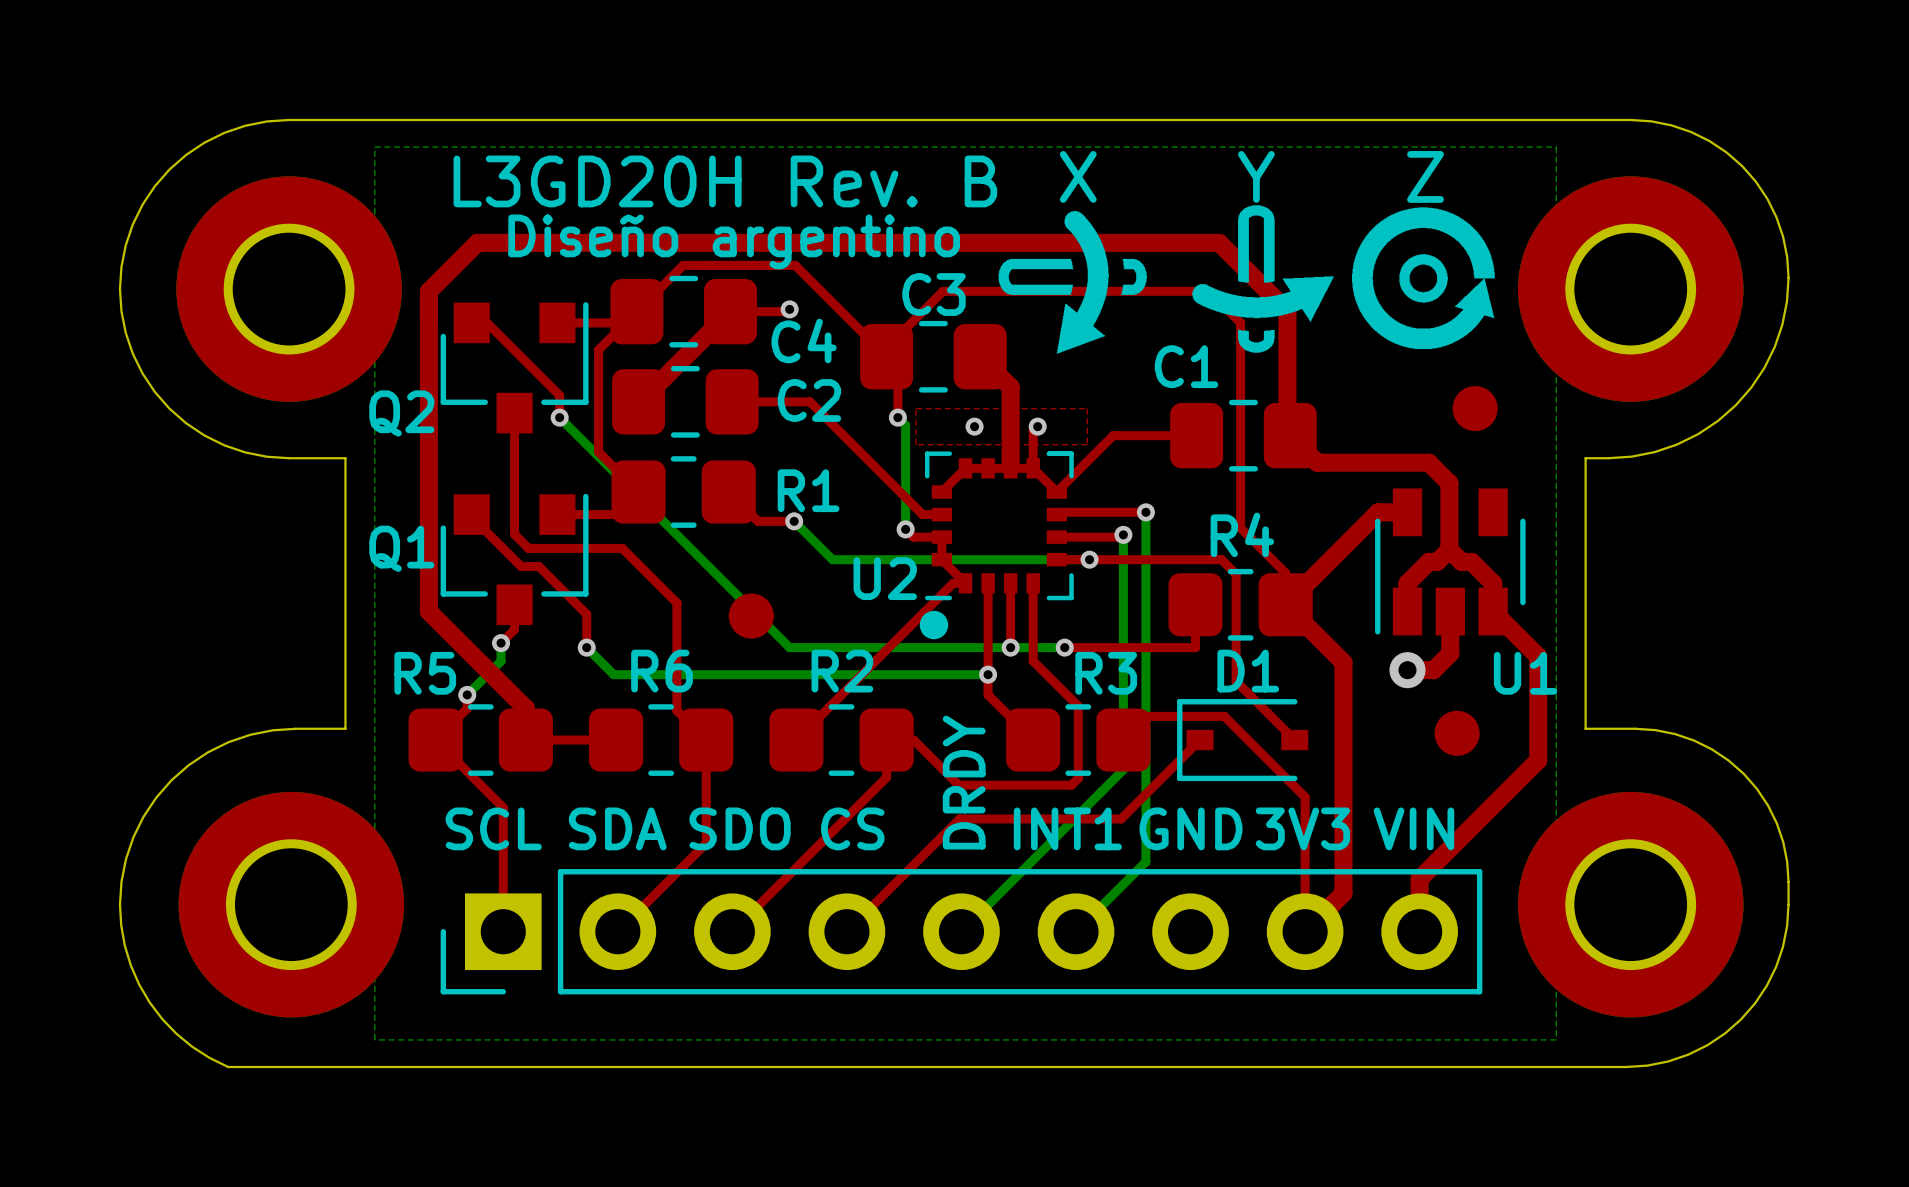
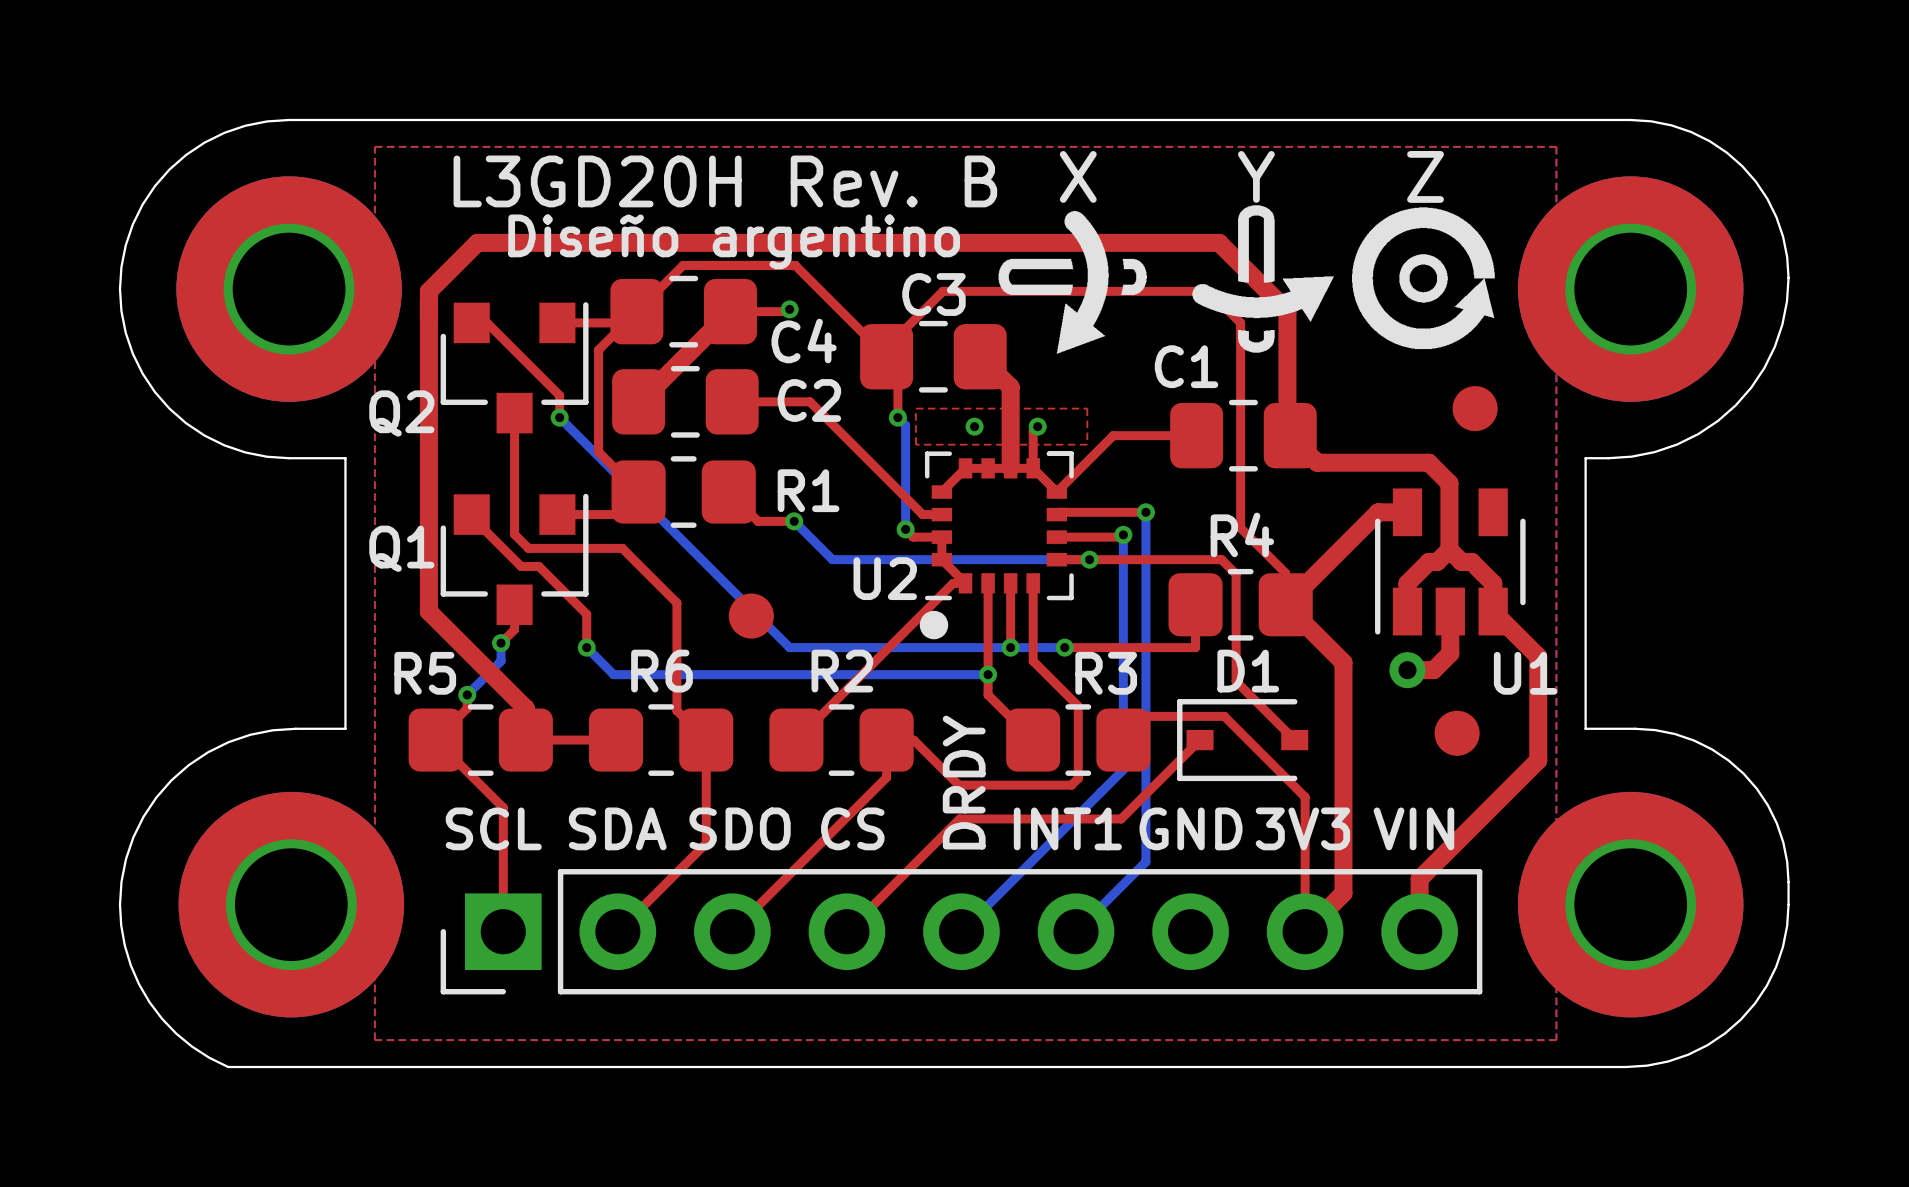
top zone outline: none -> (374, 146) (374, 1040) (1556, 1040) (1556, 146) (374, 146)

